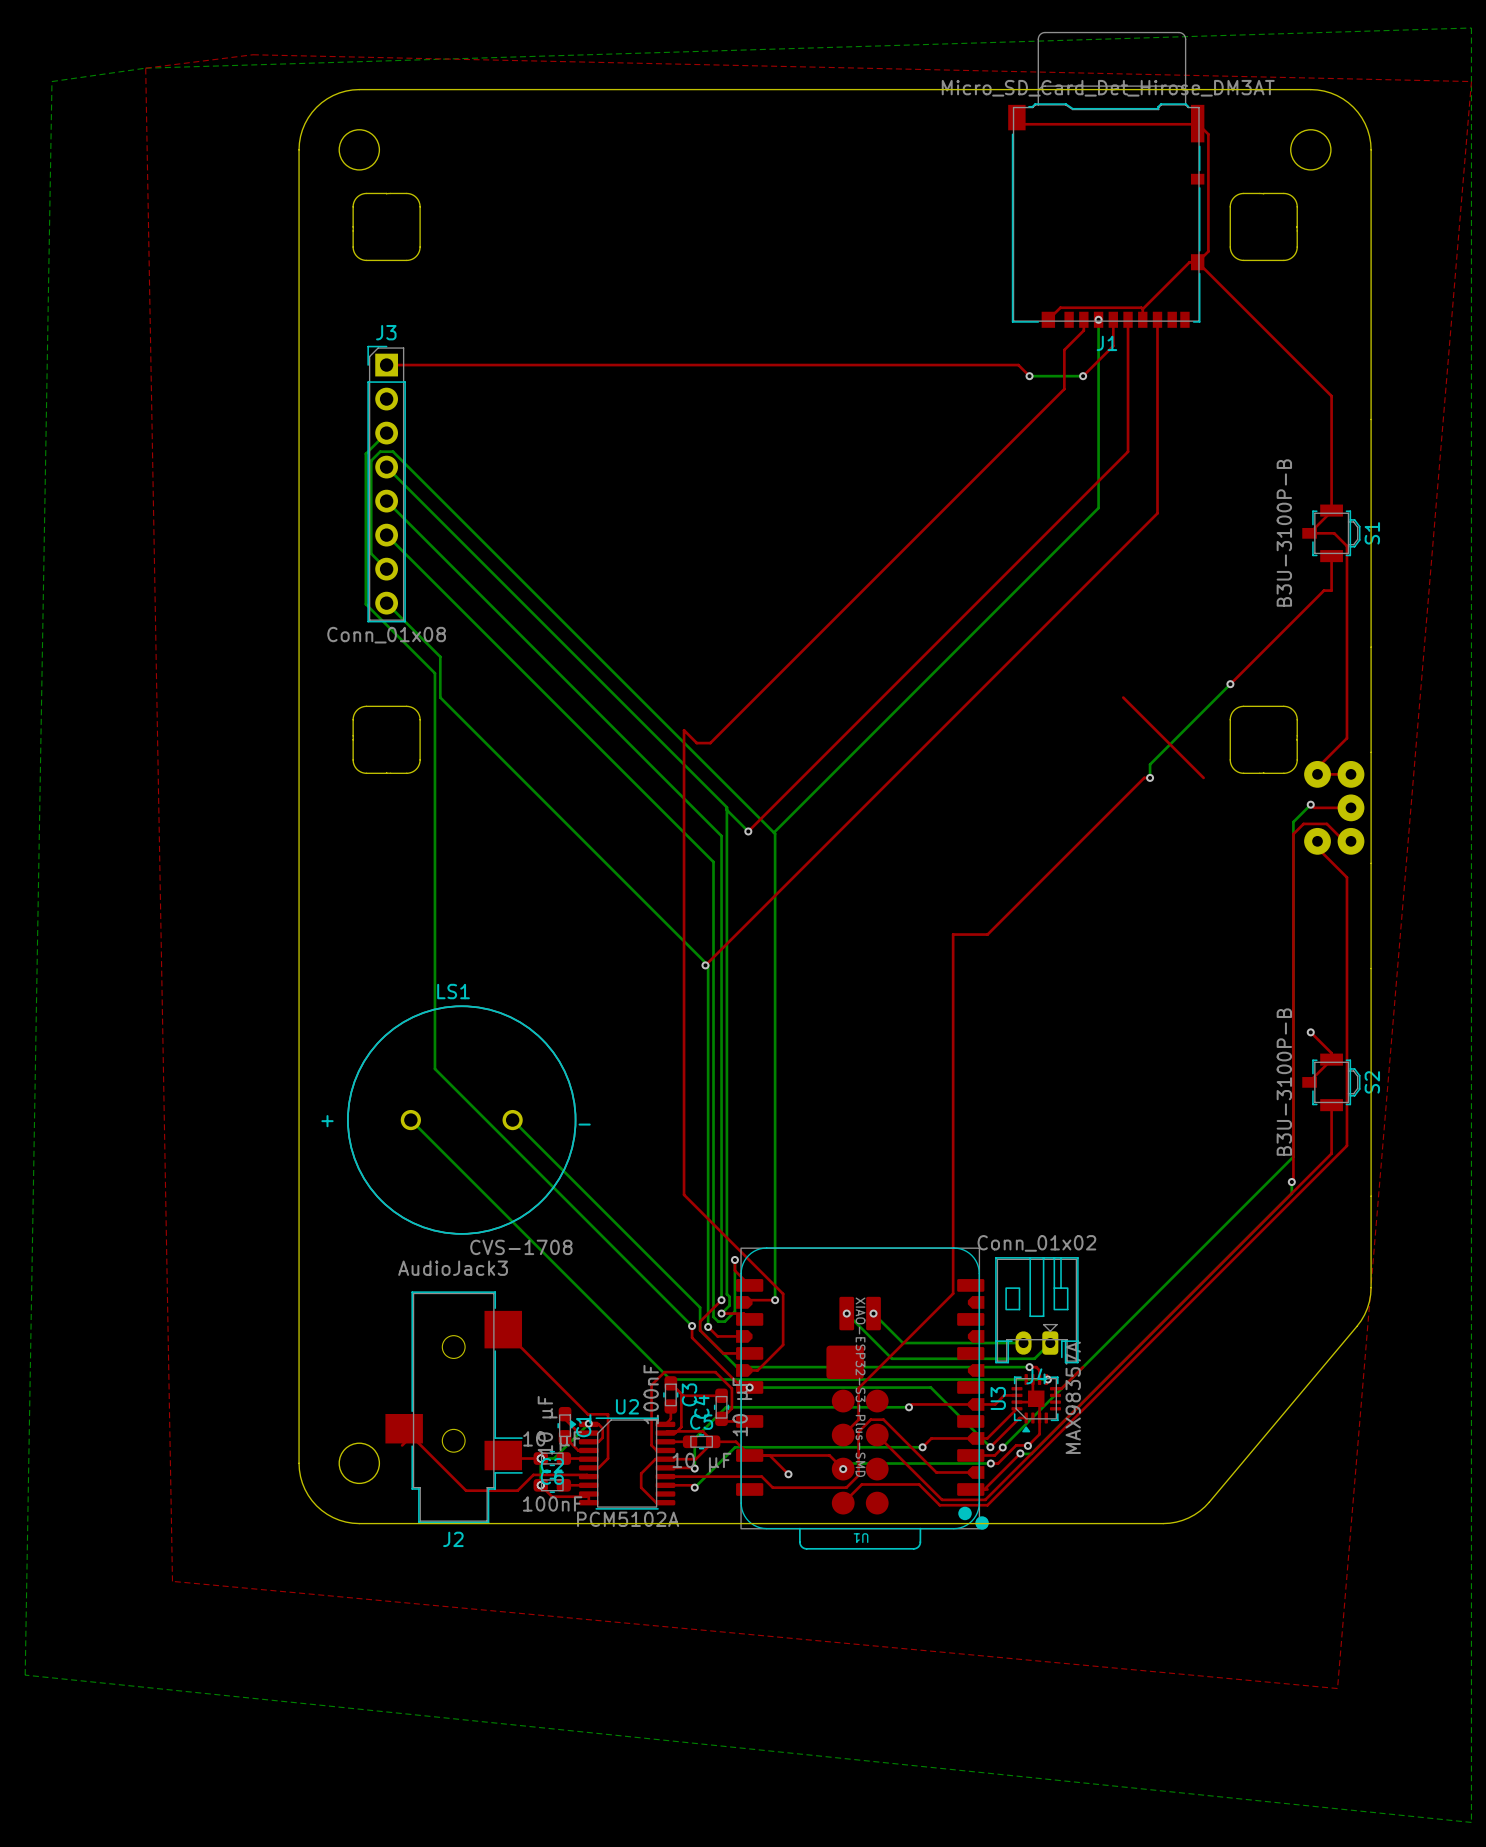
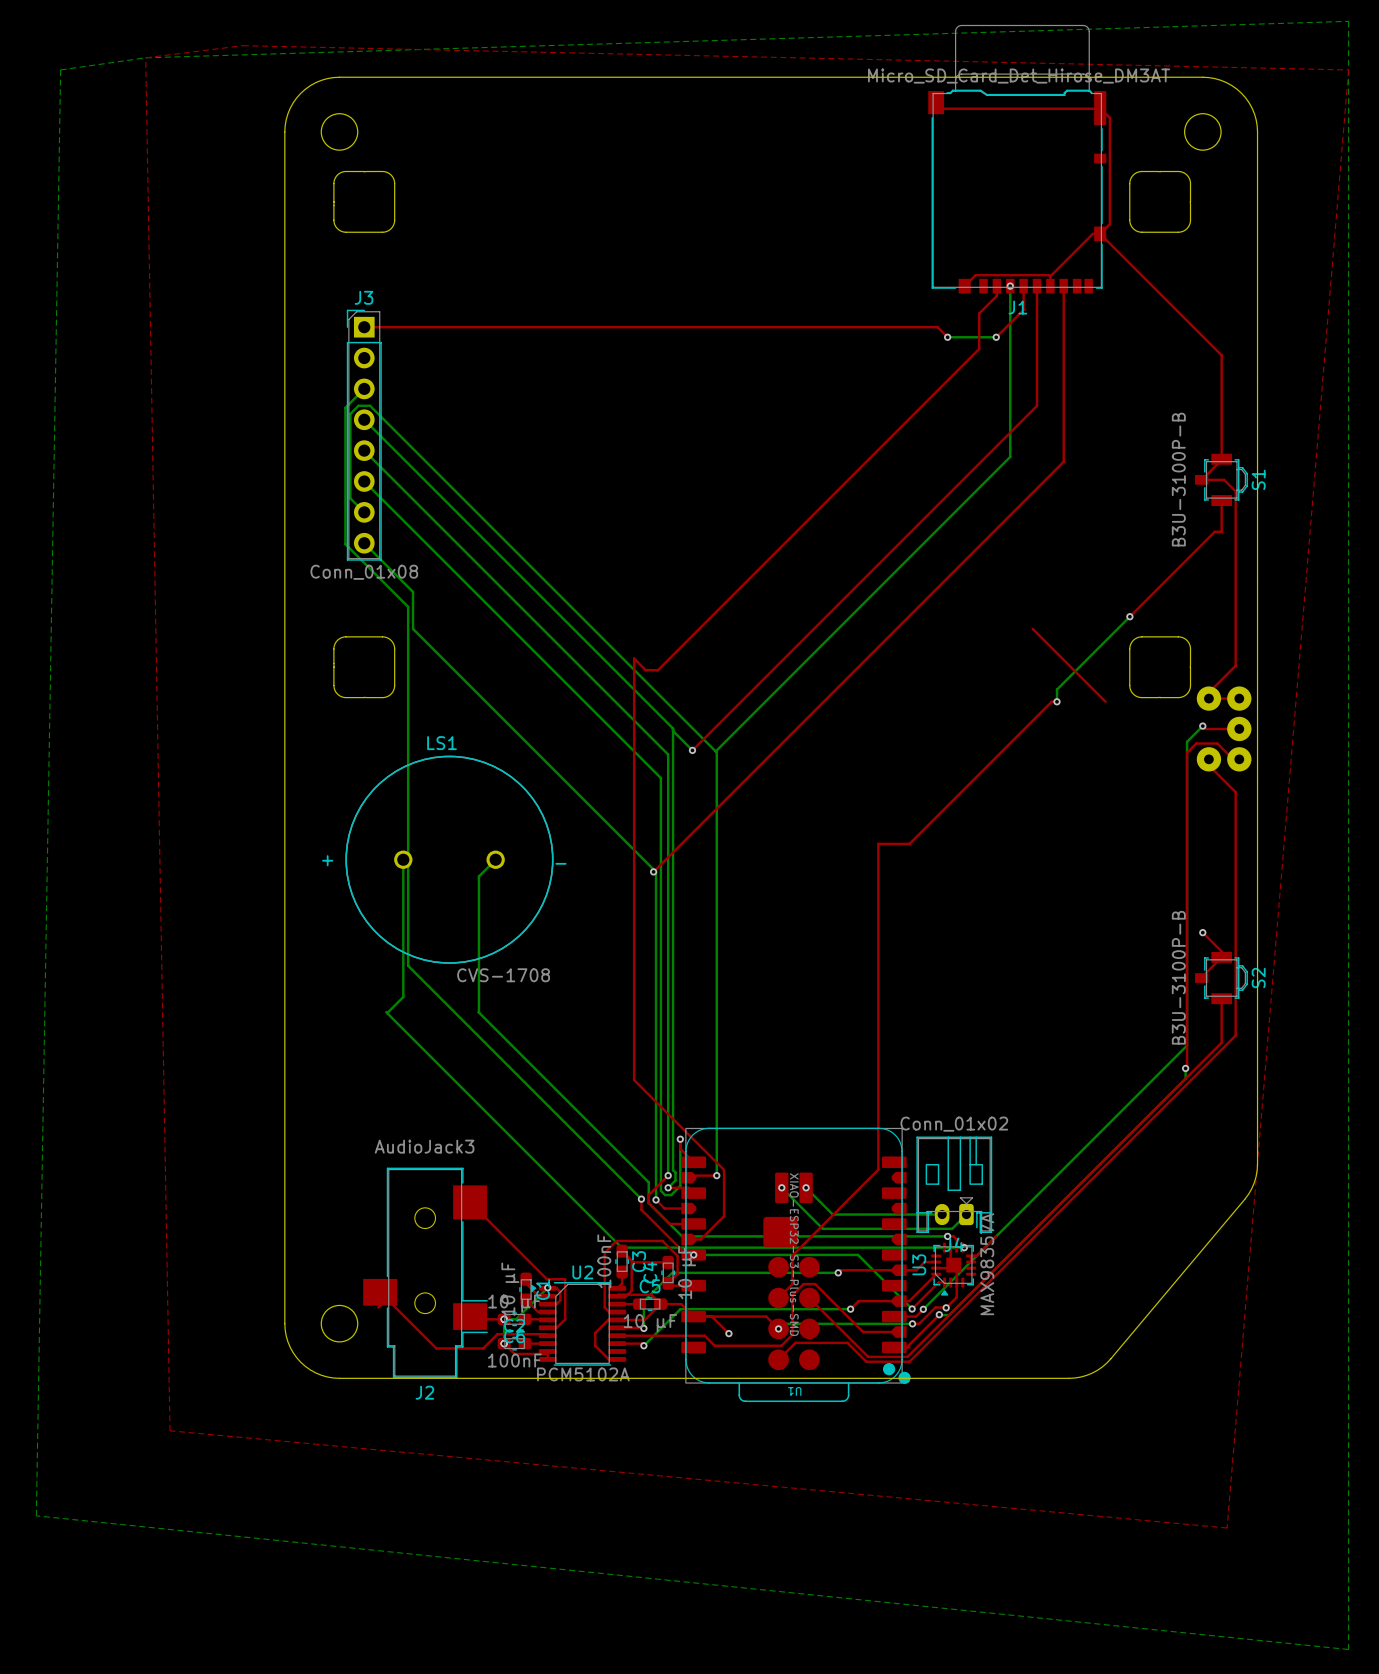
bottom track: none -> (403, 859) (403, 997) (387, 1013)
bottom track: none -> (495, 859) (478, 876) (478, 1012)
LS1 position: (461, 1120) -> (449, 859)

